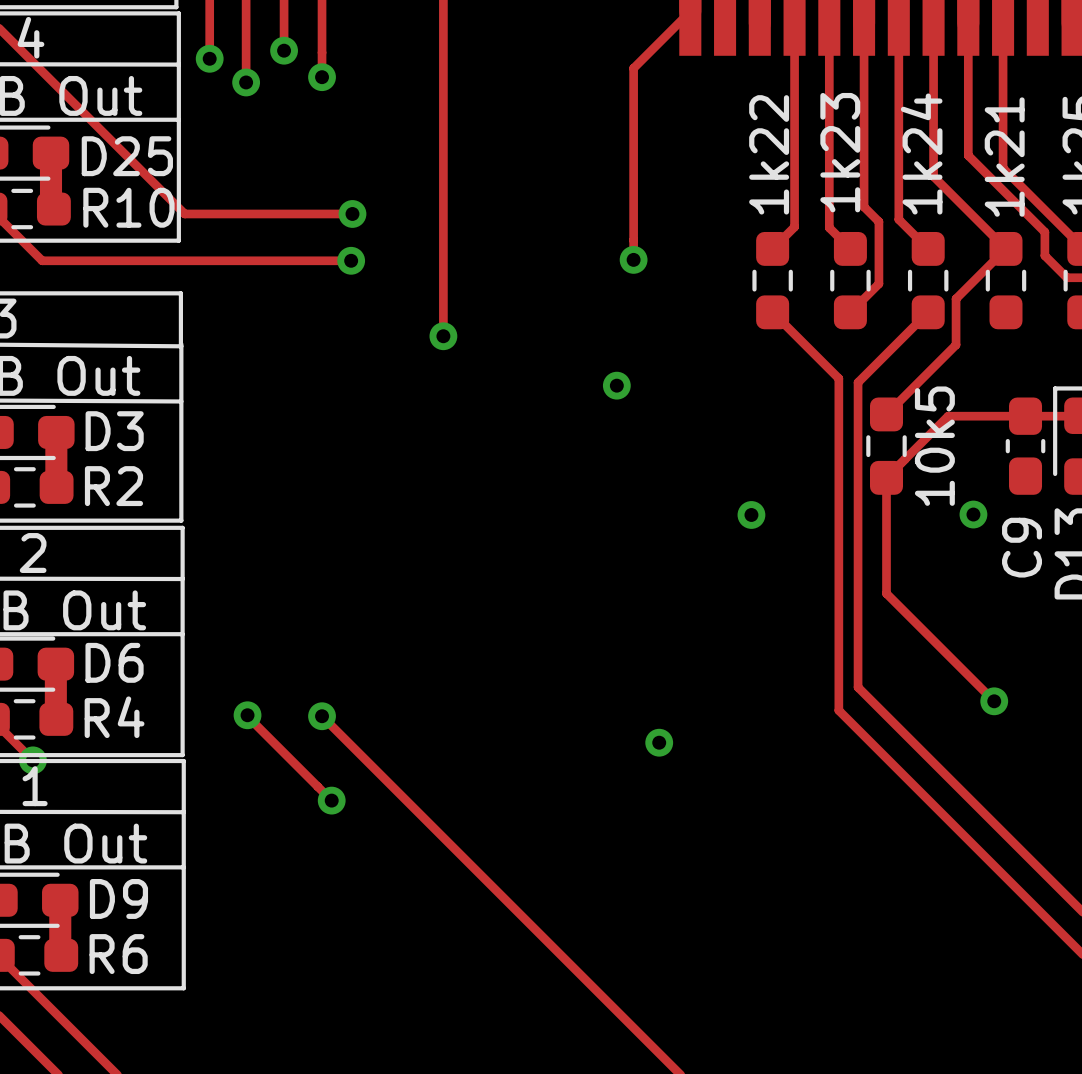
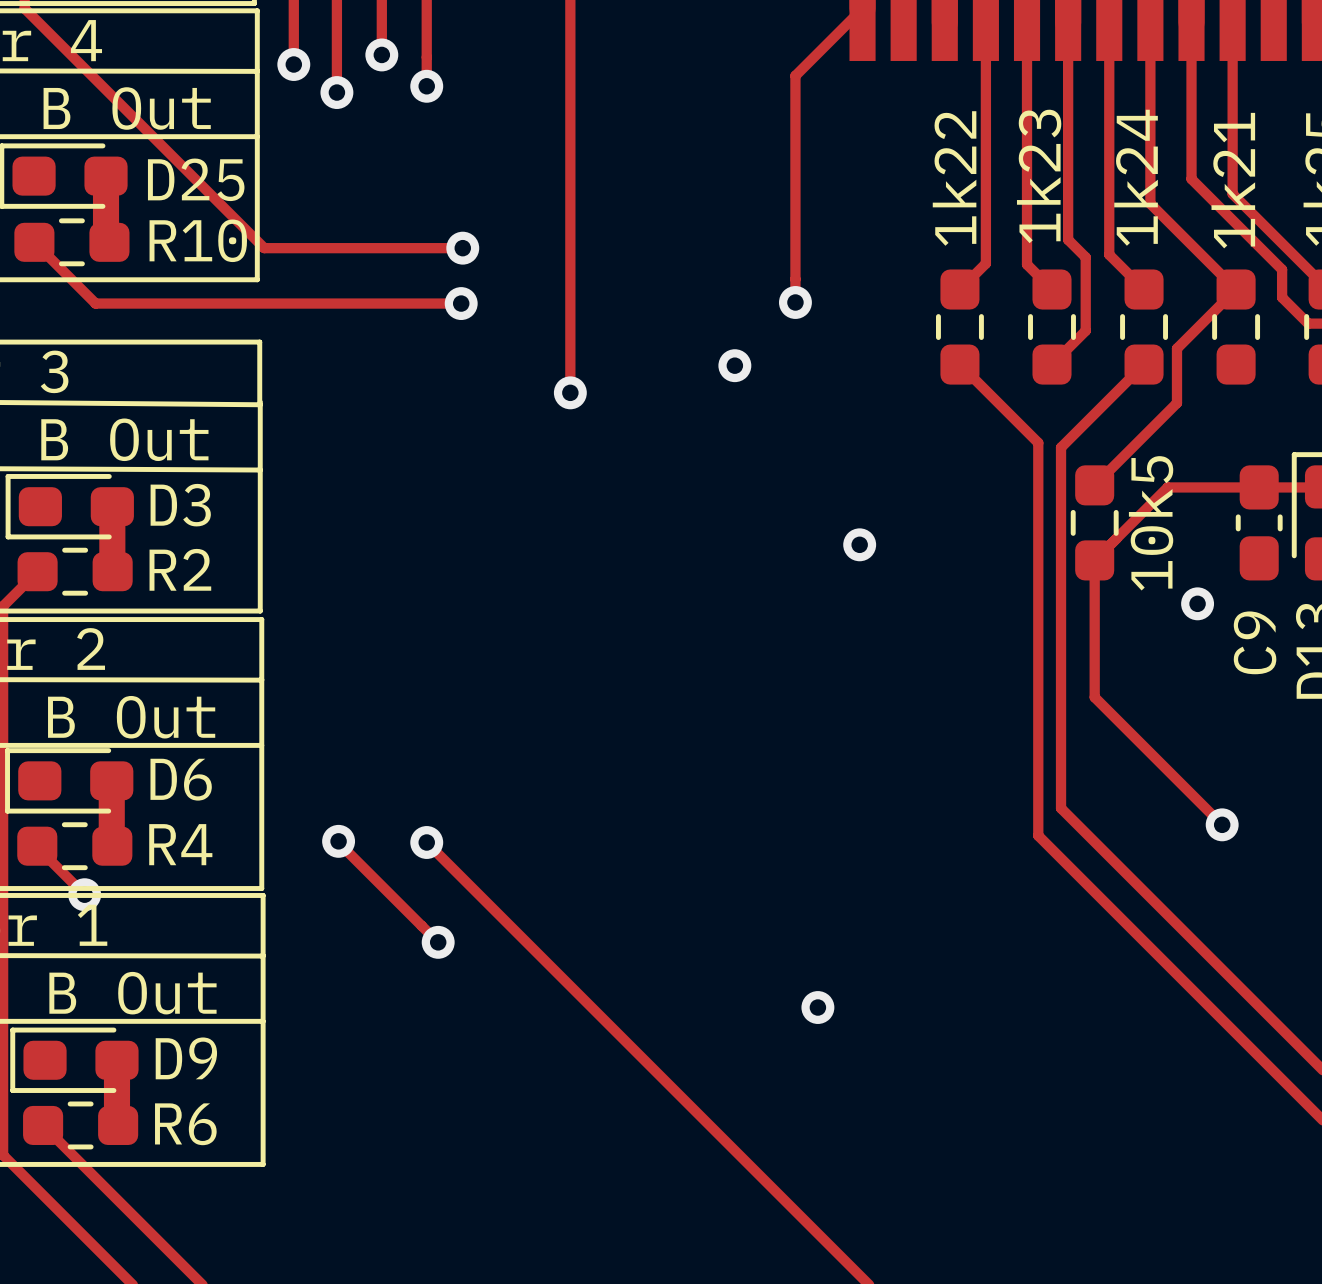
via: none -> (734, 365)
via: (616, 385) -> none
via: none -> (859, 544)
via: (751, 514) -> none
via position: (659, 742) -> (817, 1007)

